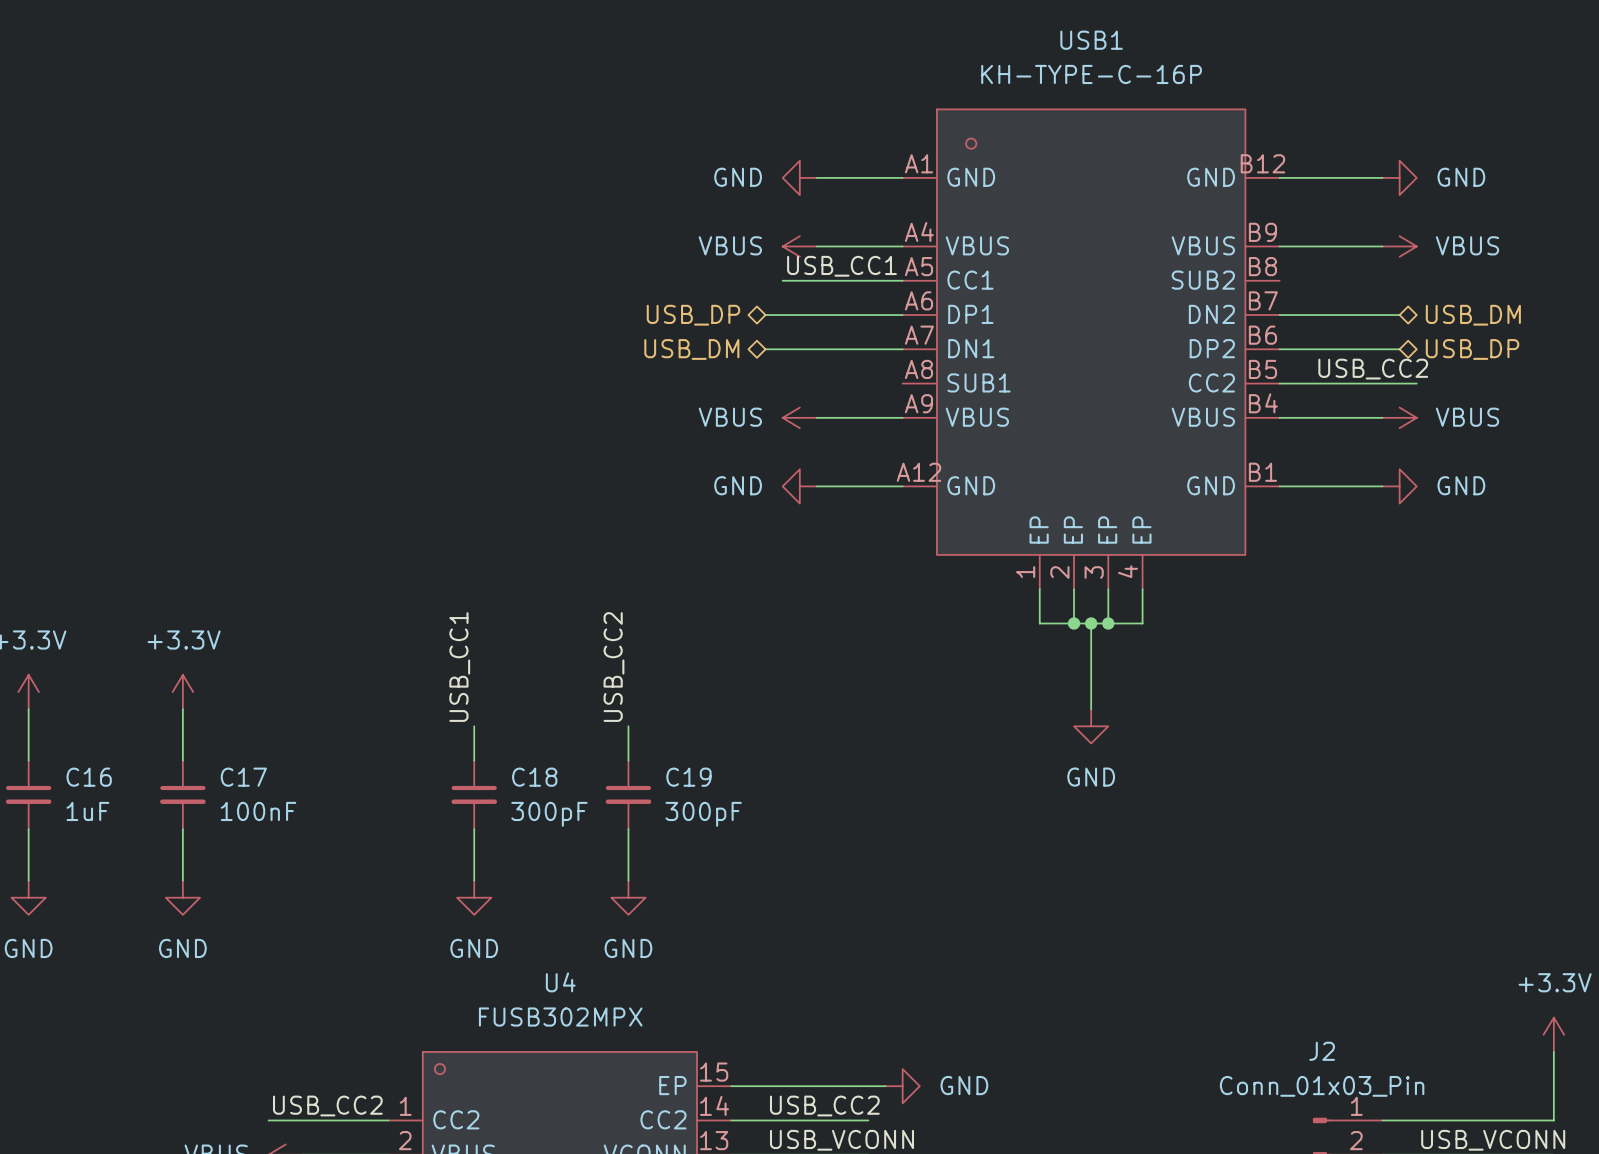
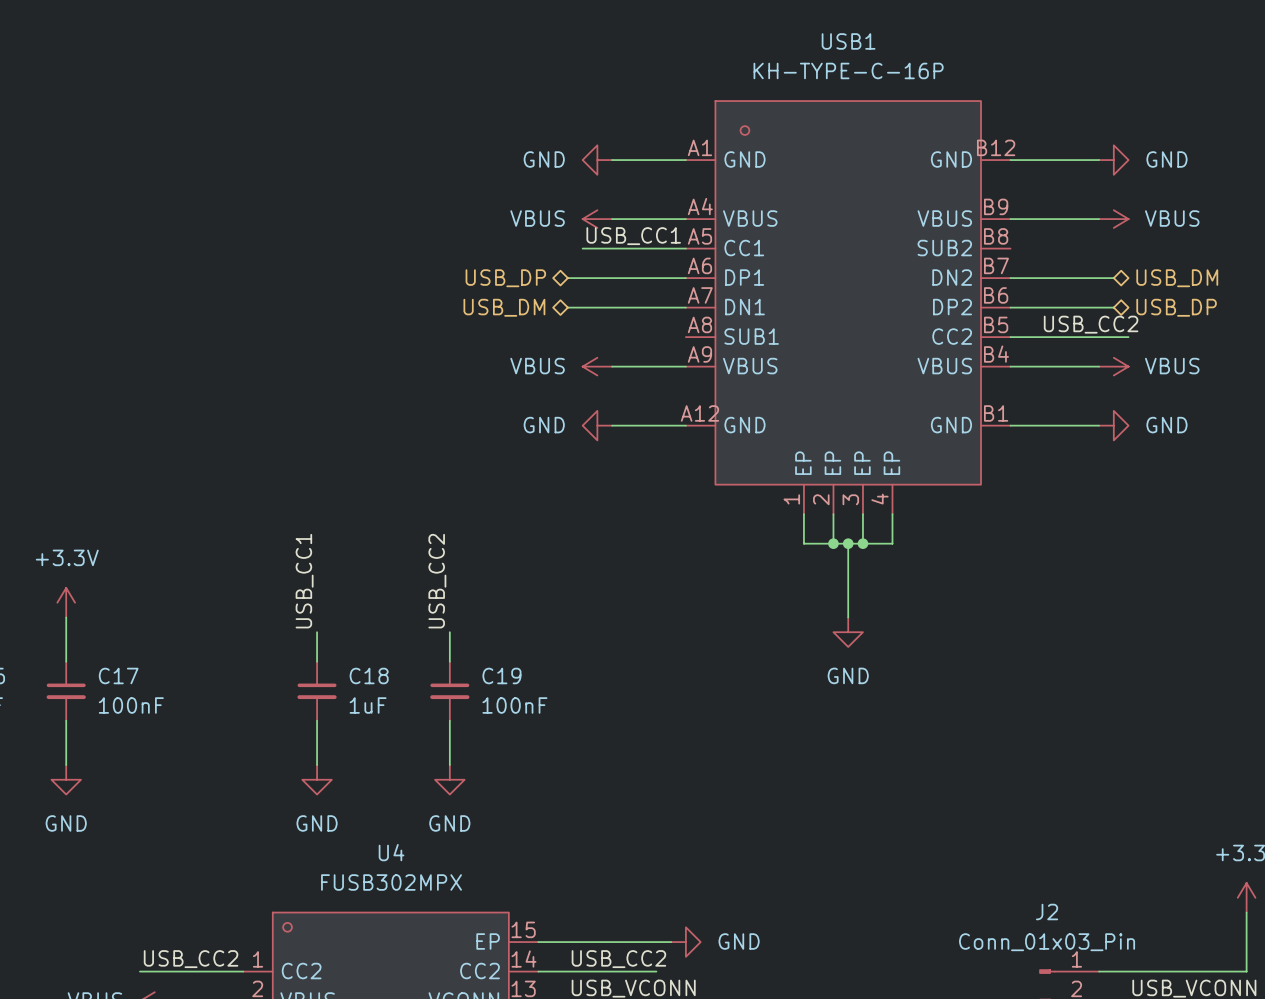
C18 value: 300pF (549, 814) -> 1uF (368, 705)
C19 value: 300pF (703, 814) -> 100nF (514, 705)

